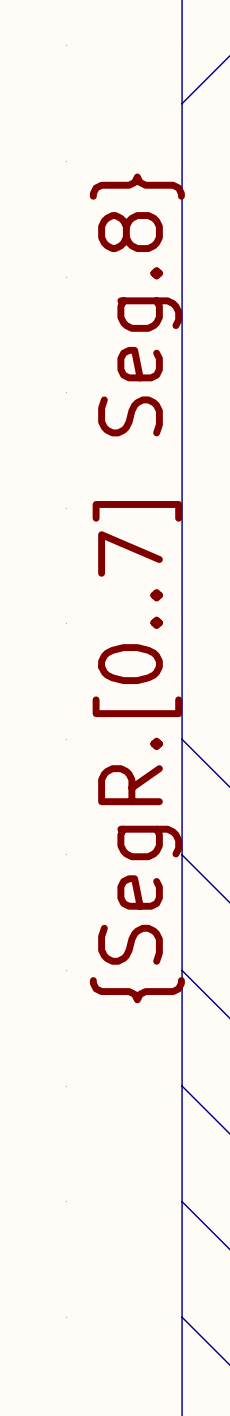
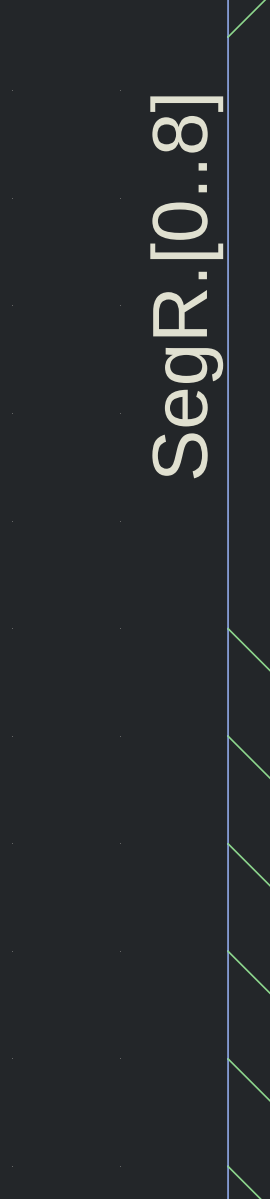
label: {SegR.[0..7] Seg.8} (137, 588) -> SegR.[0..8] (186, 287)

